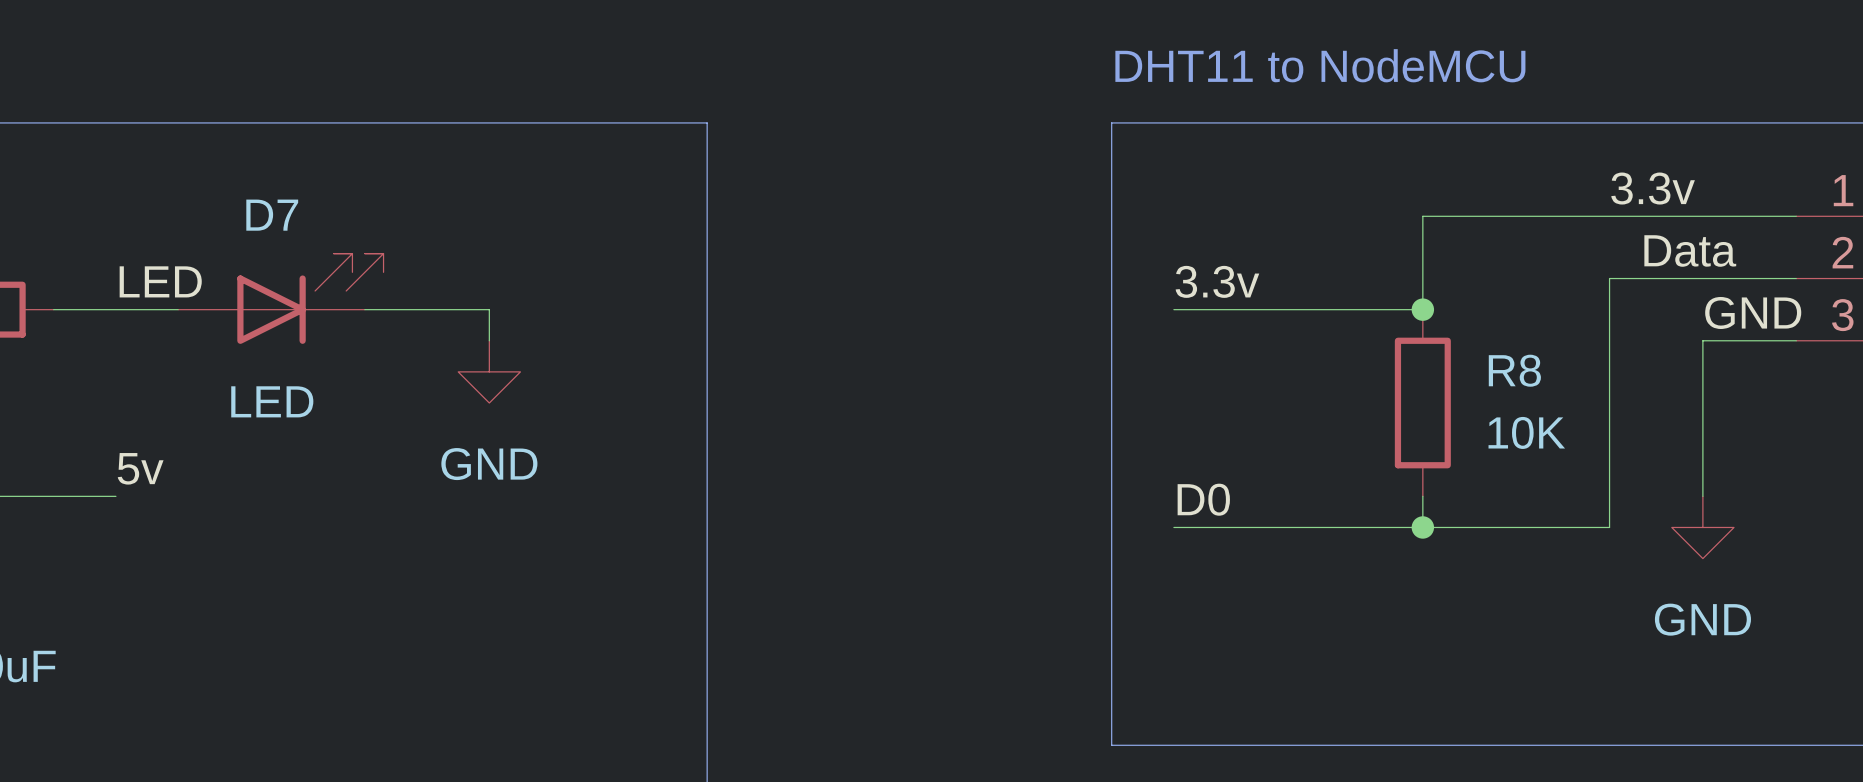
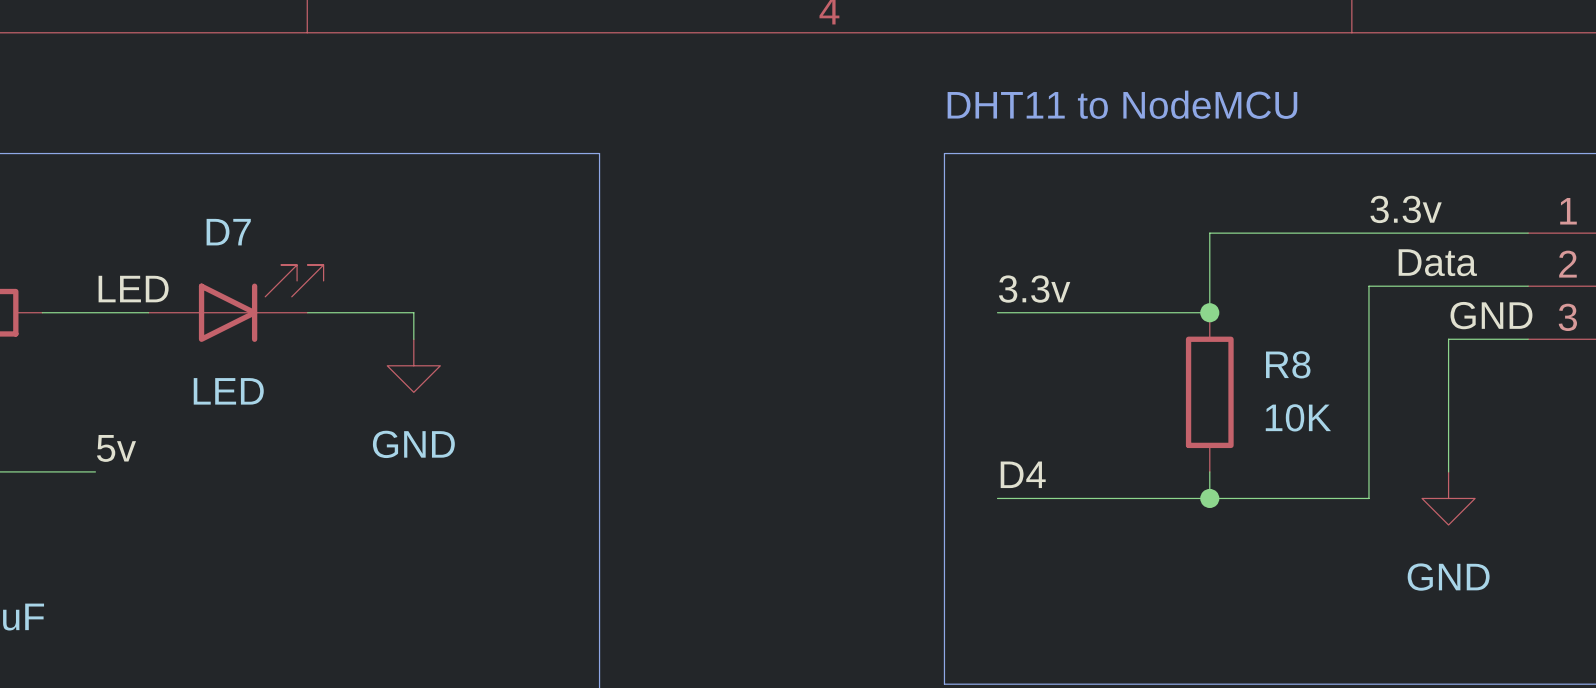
label: D0 (1203, 499) -> D4 (1023, 474)

